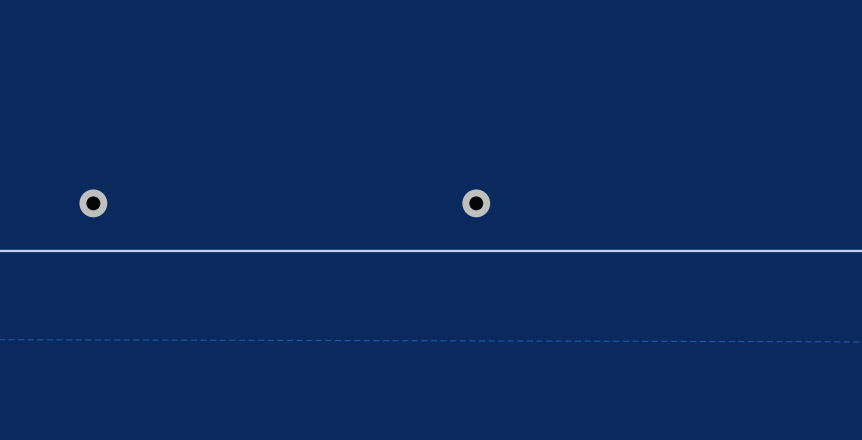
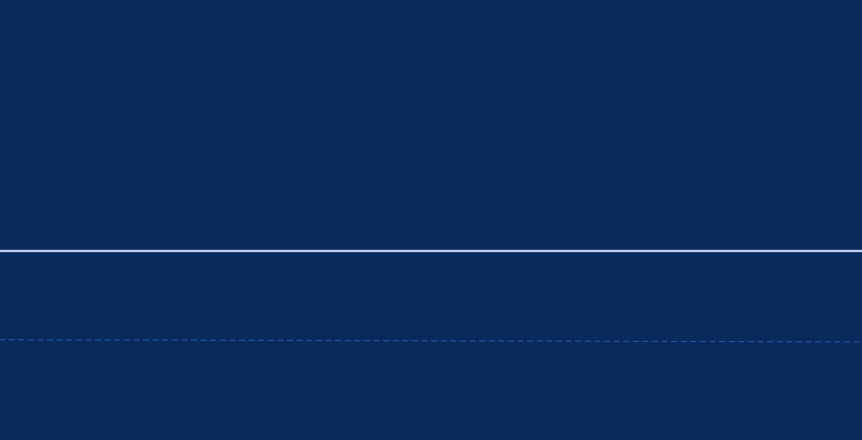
via: (93, 203) -> none
via: (476, 203) -> none

